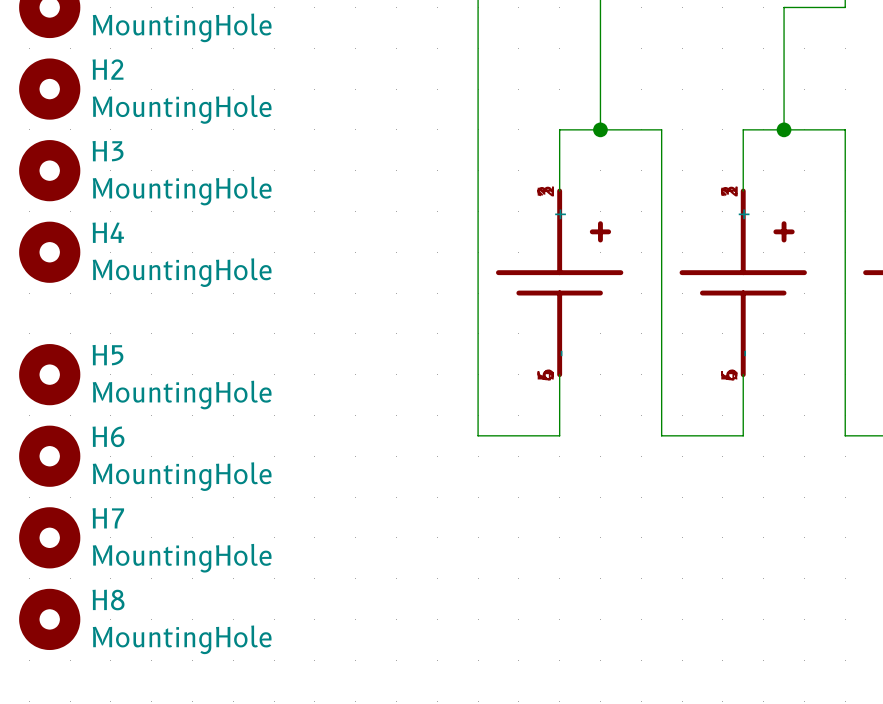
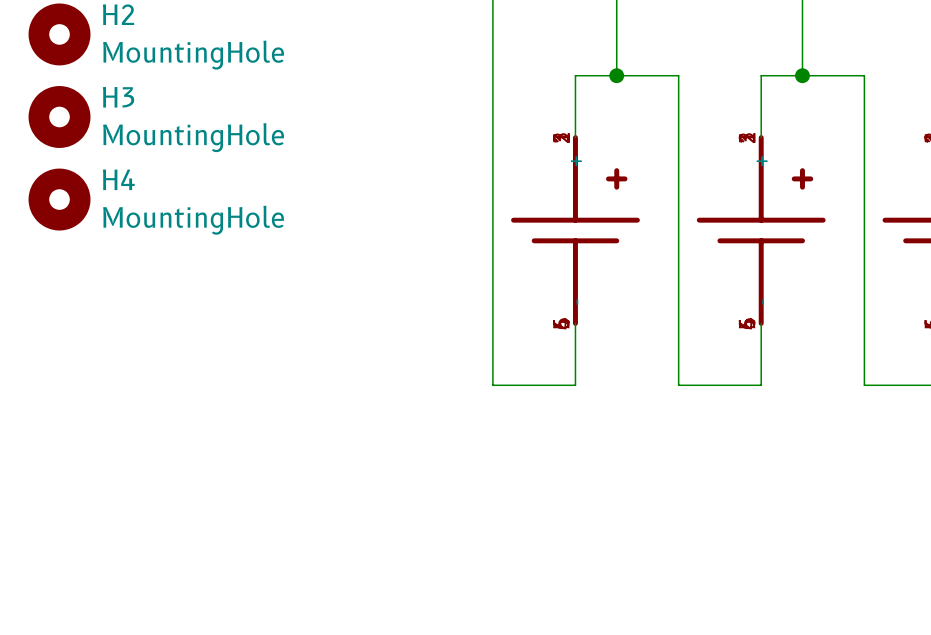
H5: MountingHole (49, 374) -> none
H6: MountingHole (49, 456) -> none
H7: MountingHole (49, 537) -> none
H8: MountingHole (49, 619) -> none

